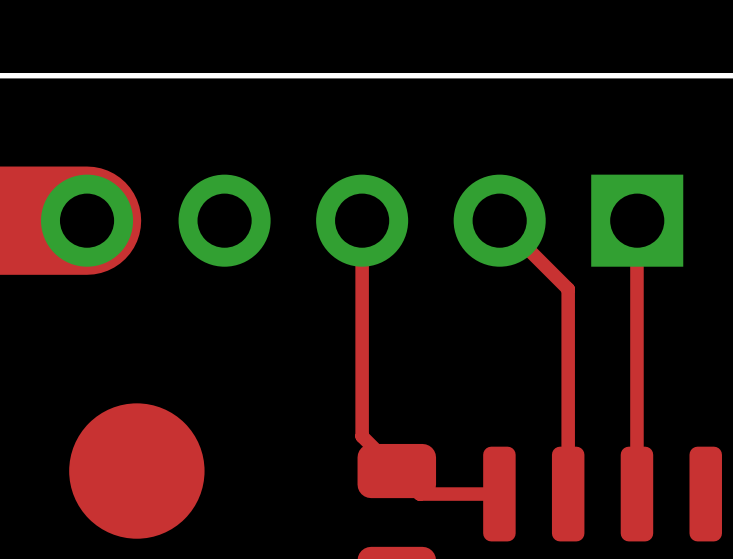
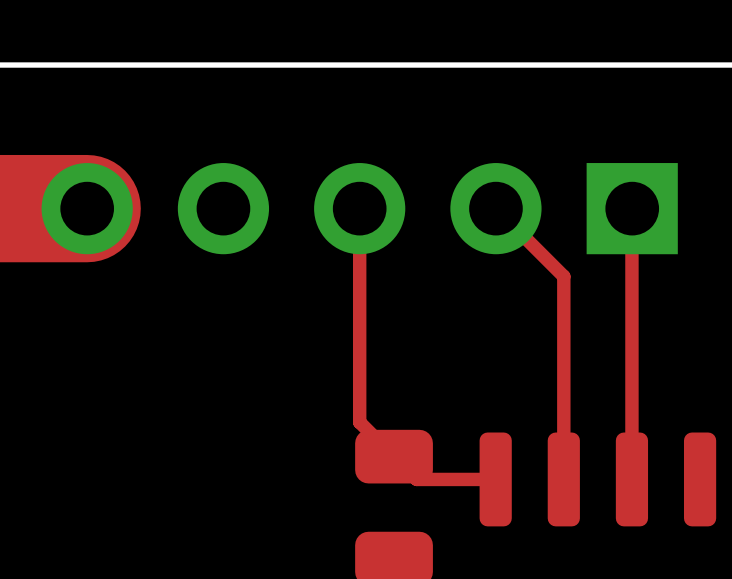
part: (136, 471) -> none

